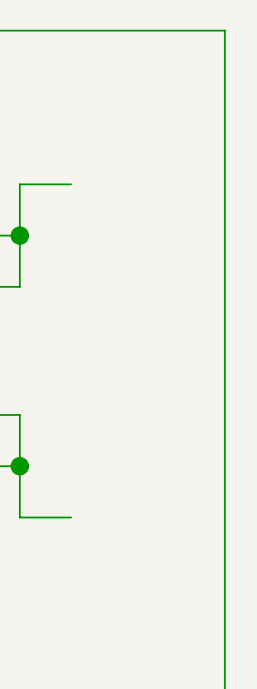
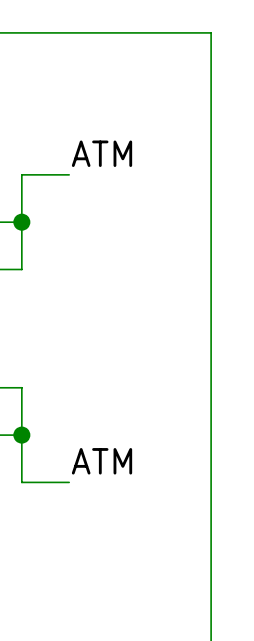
label: none -> ATM (102, 153)
label: none -> ATM (102, 461)

